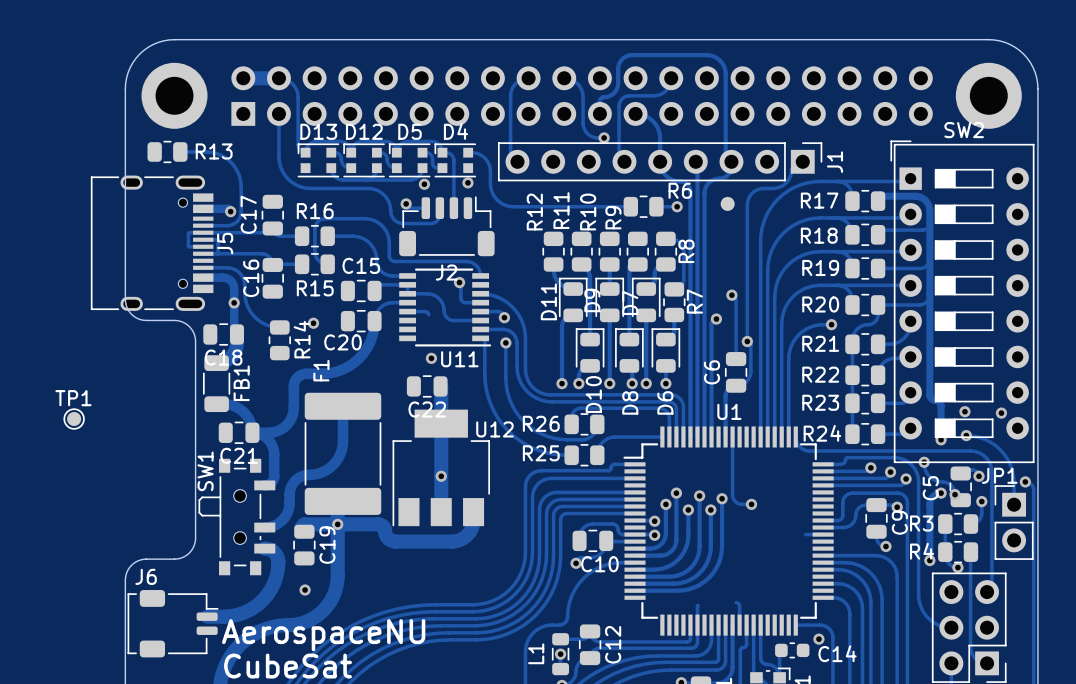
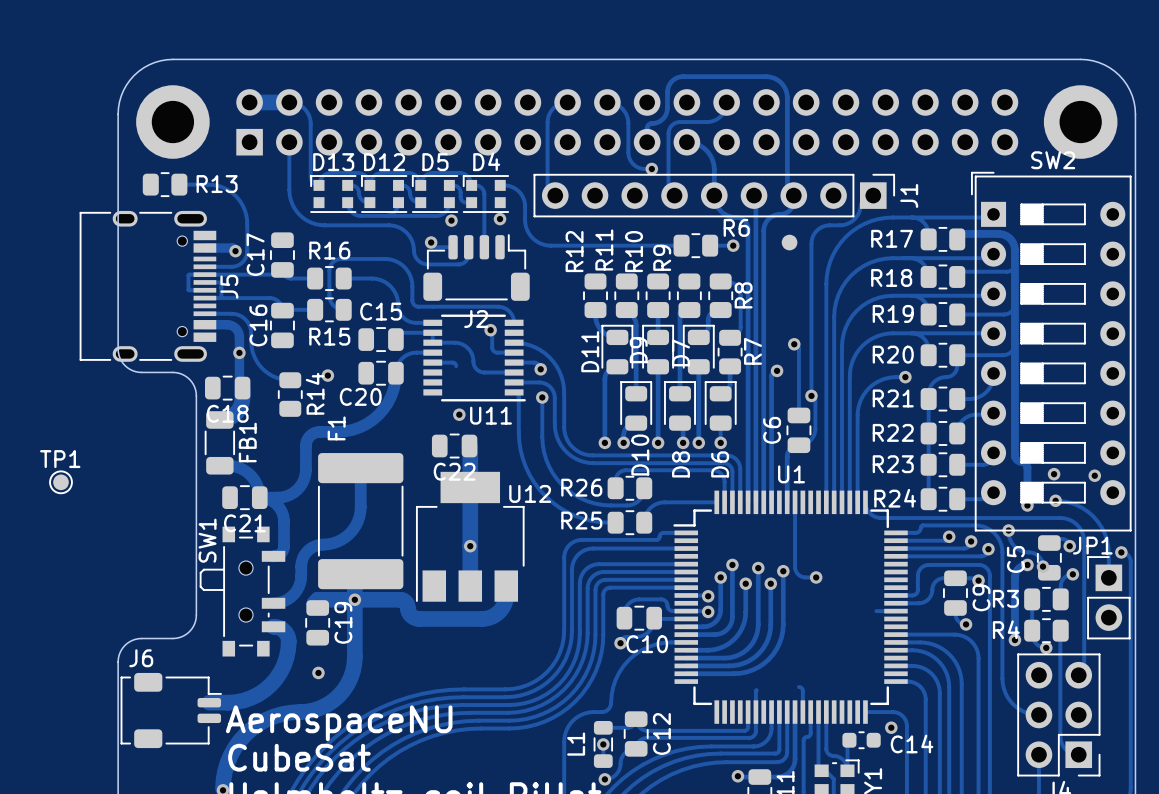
track: (981, 501) (980, 517) (976, 522) (970, 524) -> none
track: none -> (1074, 576) (1068, 575) (1062, 580) (1060, 596)

